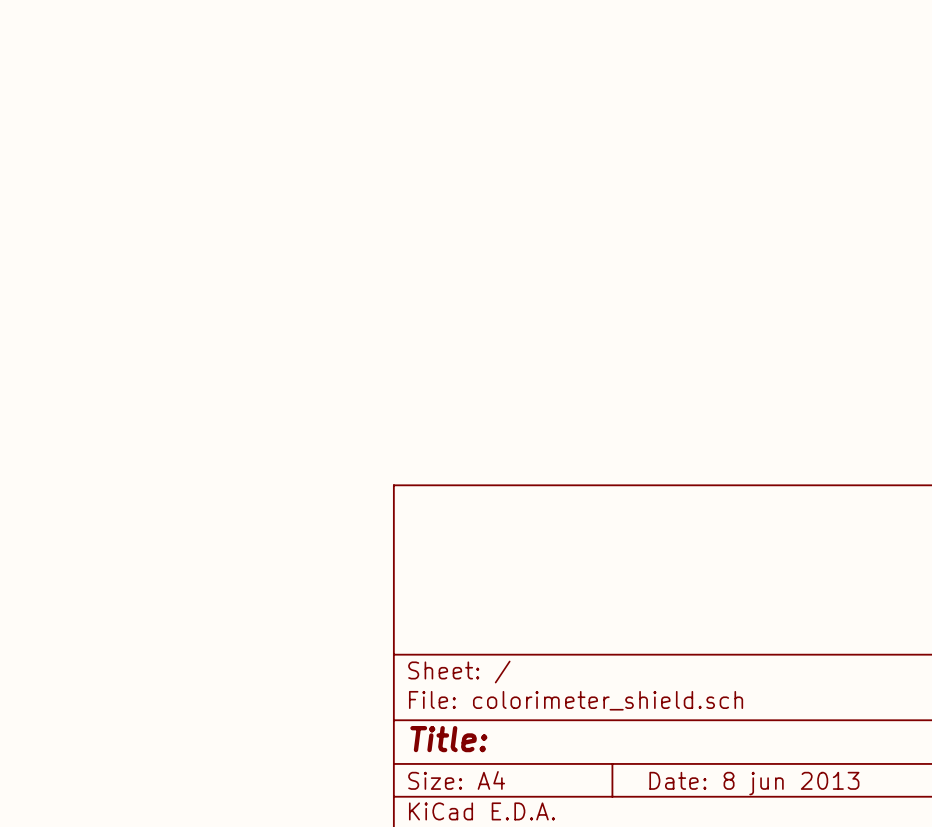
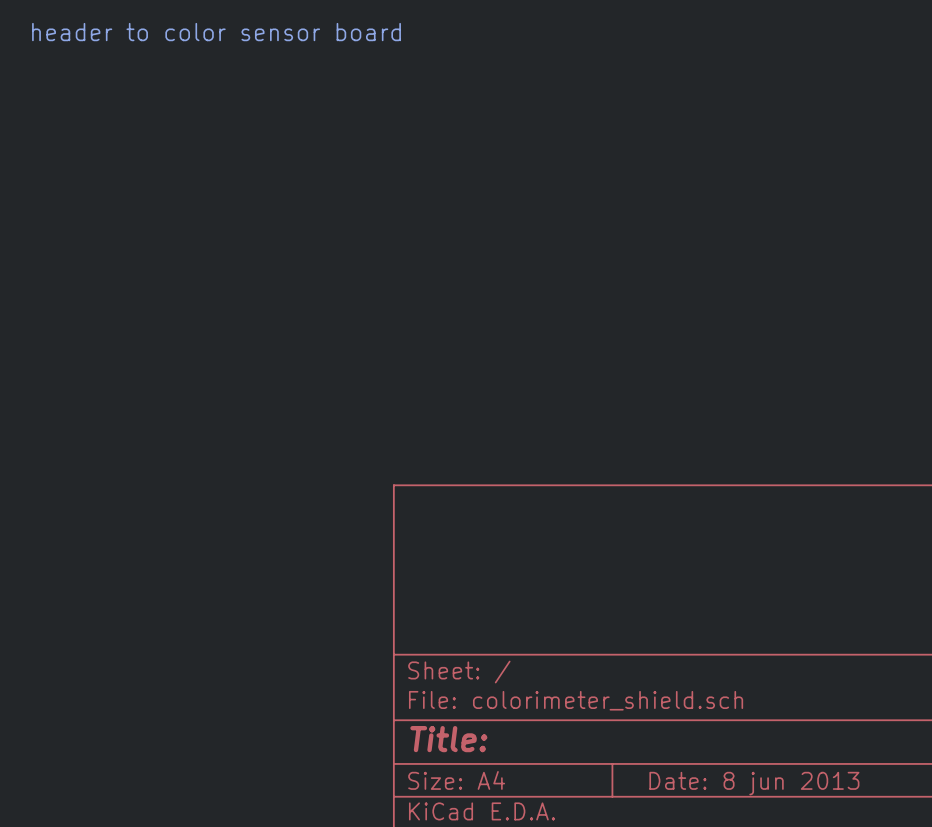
text: none -> header to color sensor board (216, 32)

